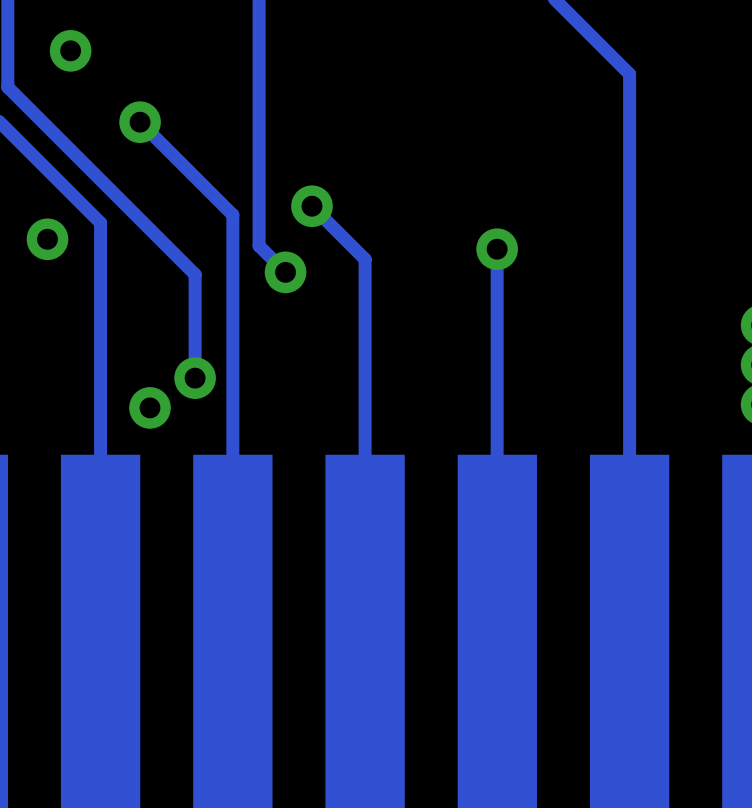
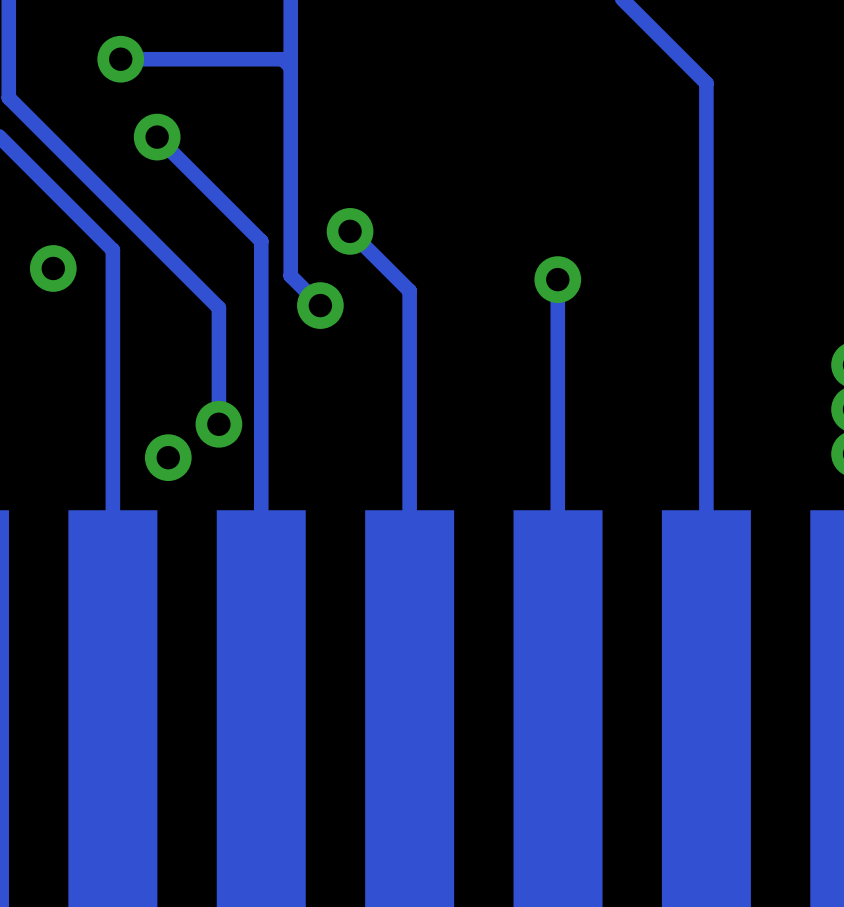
via position: (70, 50) -> (120, 59)
track: none -> (120, 59) (282, 59) (290, 67)

